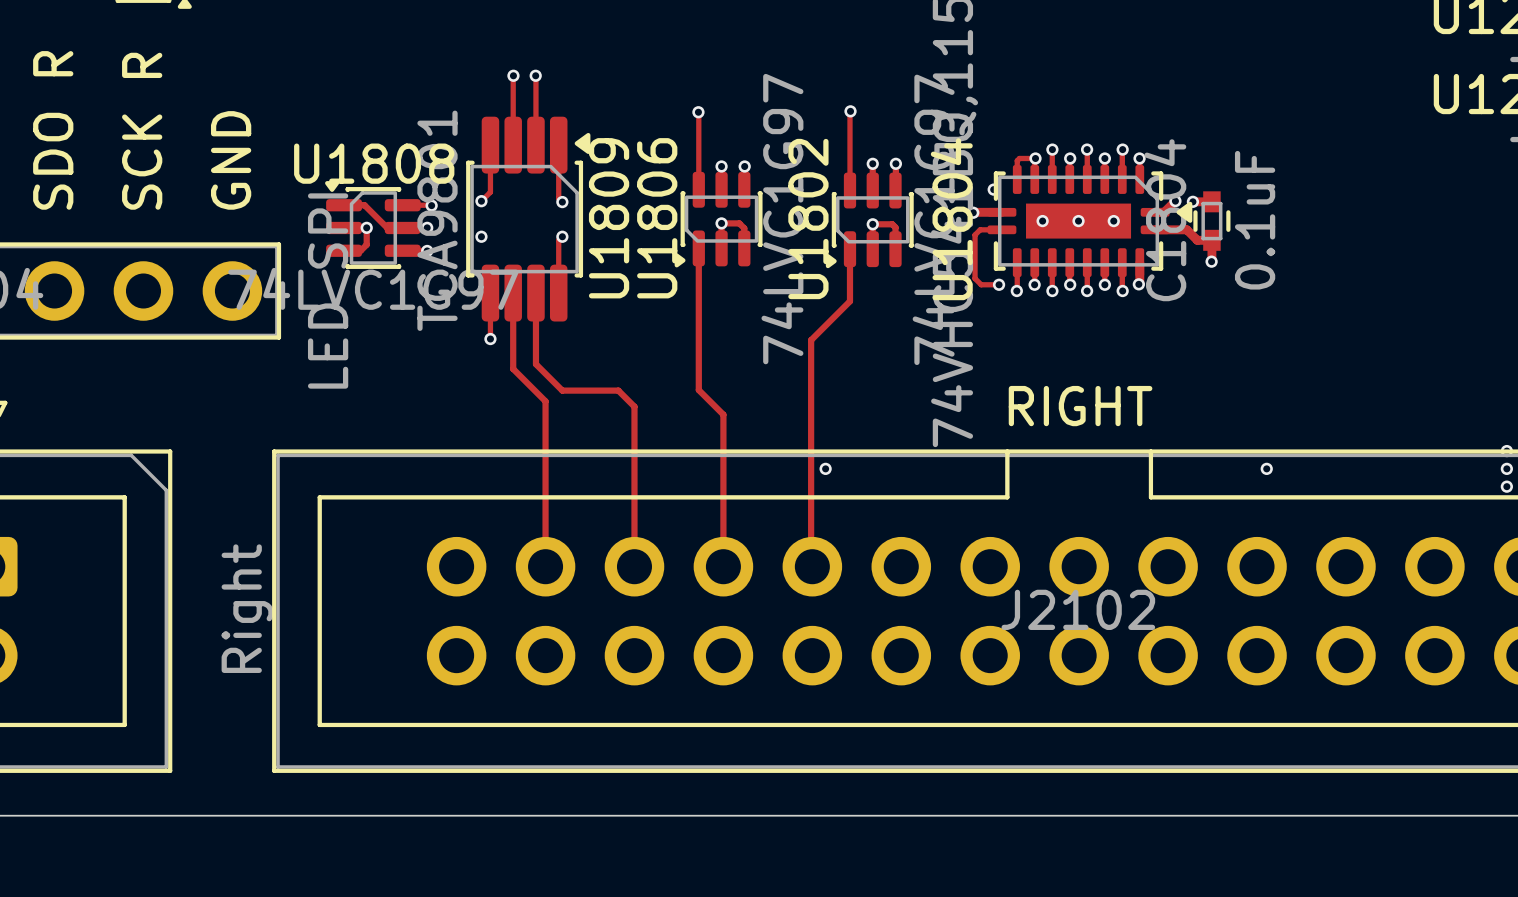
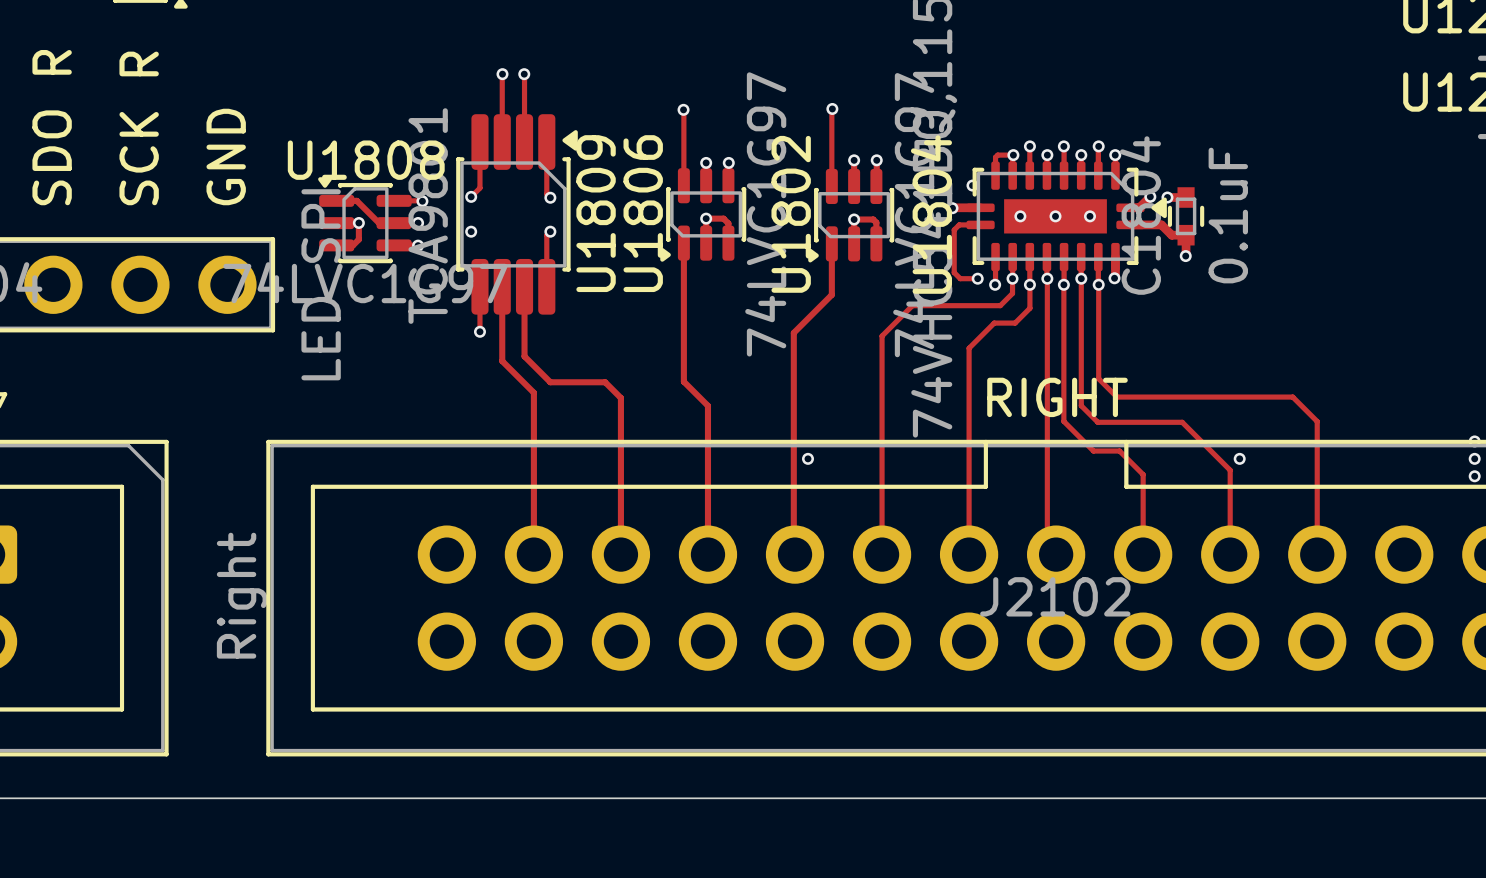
track: none -> (1012, 278) (1012, 293) (1000, 305) (912, 305) (882, 336) (882, 554)
track: none -> (1047, 278) (1047, 545) (1056, 554)
track: none -> (1081, 278) (1081, 405) (1097, 422) (1182, 422) (1230, 470) (1230, 554)
track: none -> (1029, 284) (1029, 308) (1015, 323) (994, 323) (969, 348) (969, 554)
track: none -> (1063, 284) (1063, 421) (1093, 451) (1119, 451) (1143, 474) (1143, 554)
track: none -> (1098, 284) (1098, 378) (1116, 397) (1292, 397) (1317, 421) (1317, 554)

